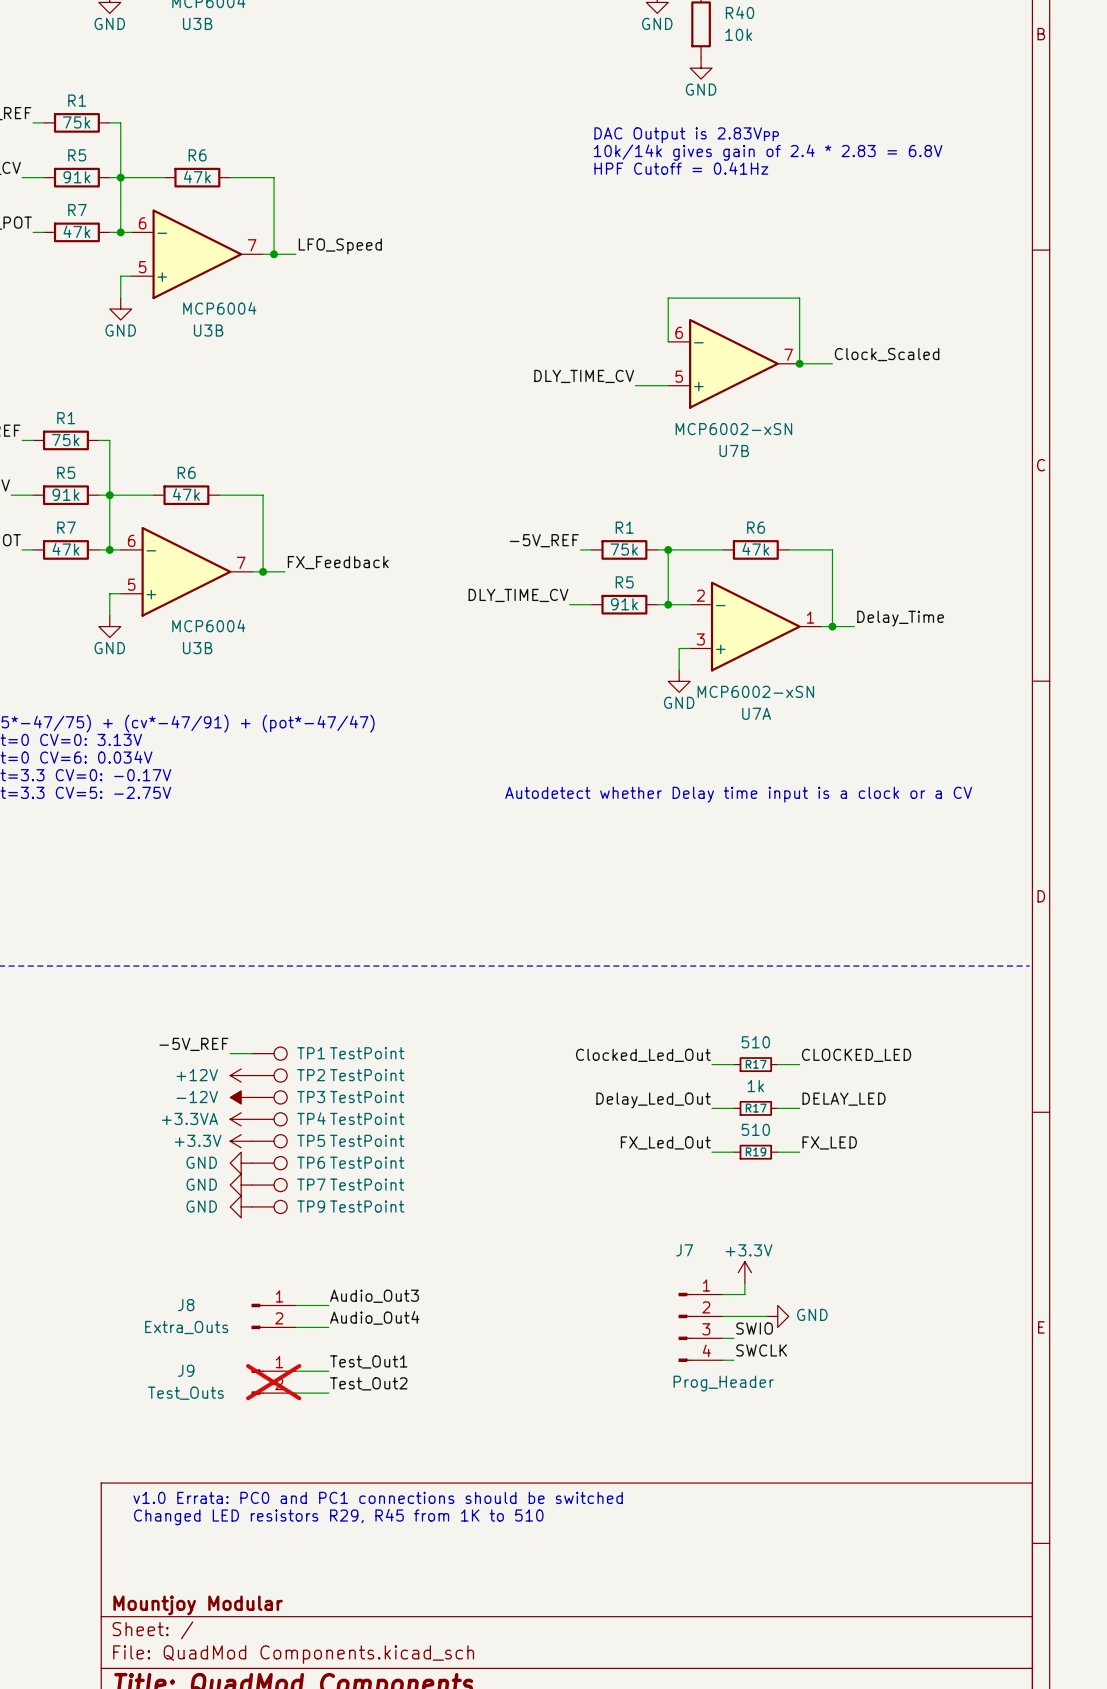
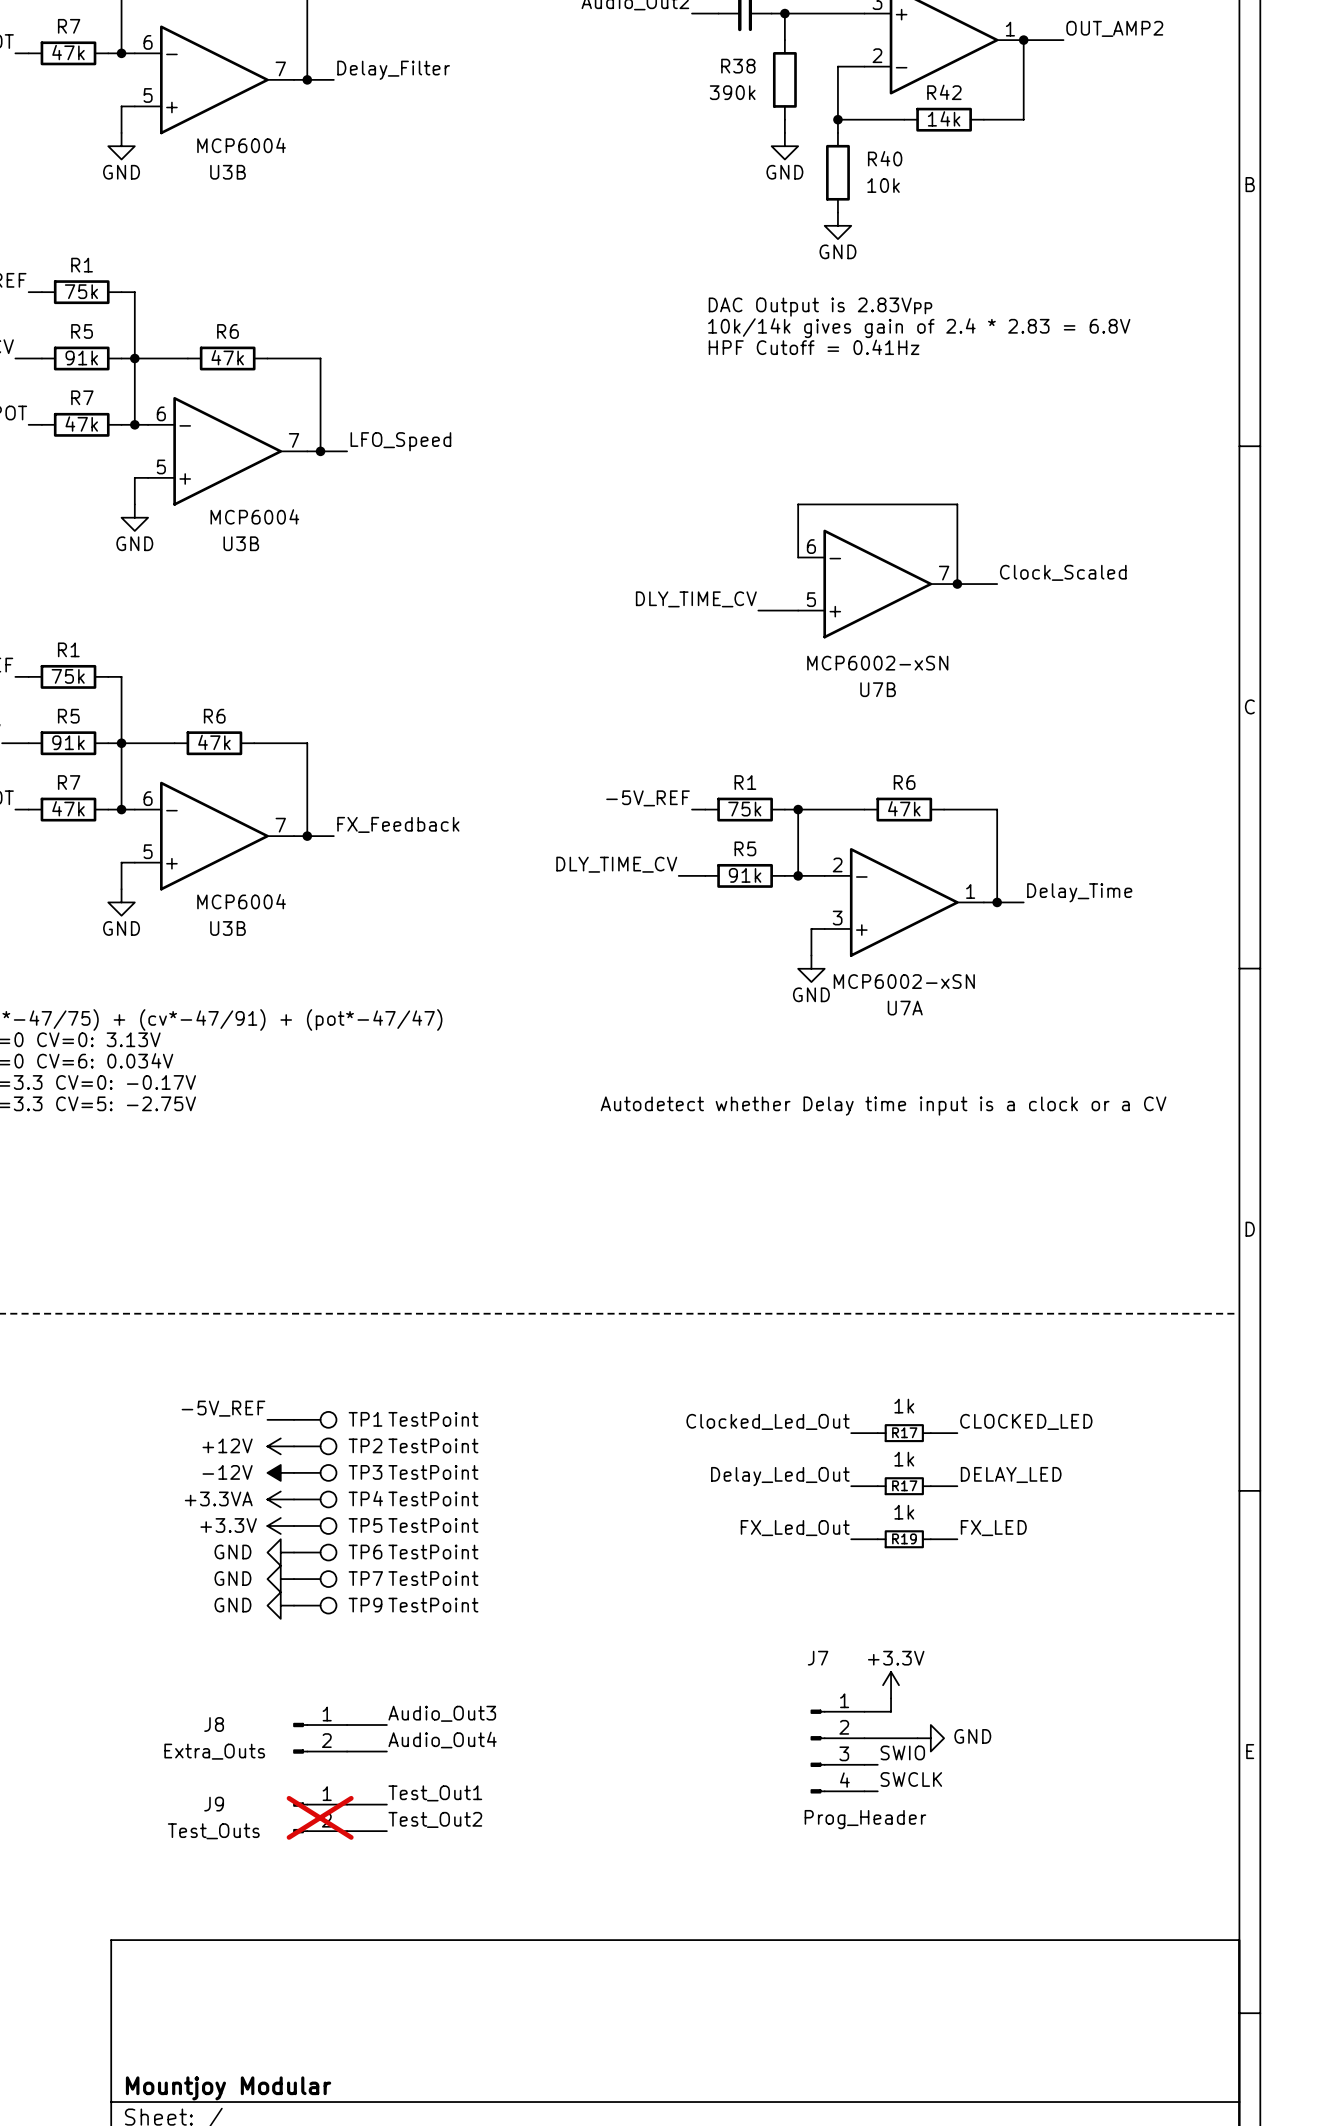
R17 value: 510 (755, 1042) -> 1k (904, 1406)
R19 value: 510 (755, 1129) -> 1k (904, 1512)
text: v1.0 Errata: PC0 and PC1 connections should be switched (378, 1497) -> none
text: Changed LED resistors R29, R45 from 1K to 510 (338, 1517) -> none

